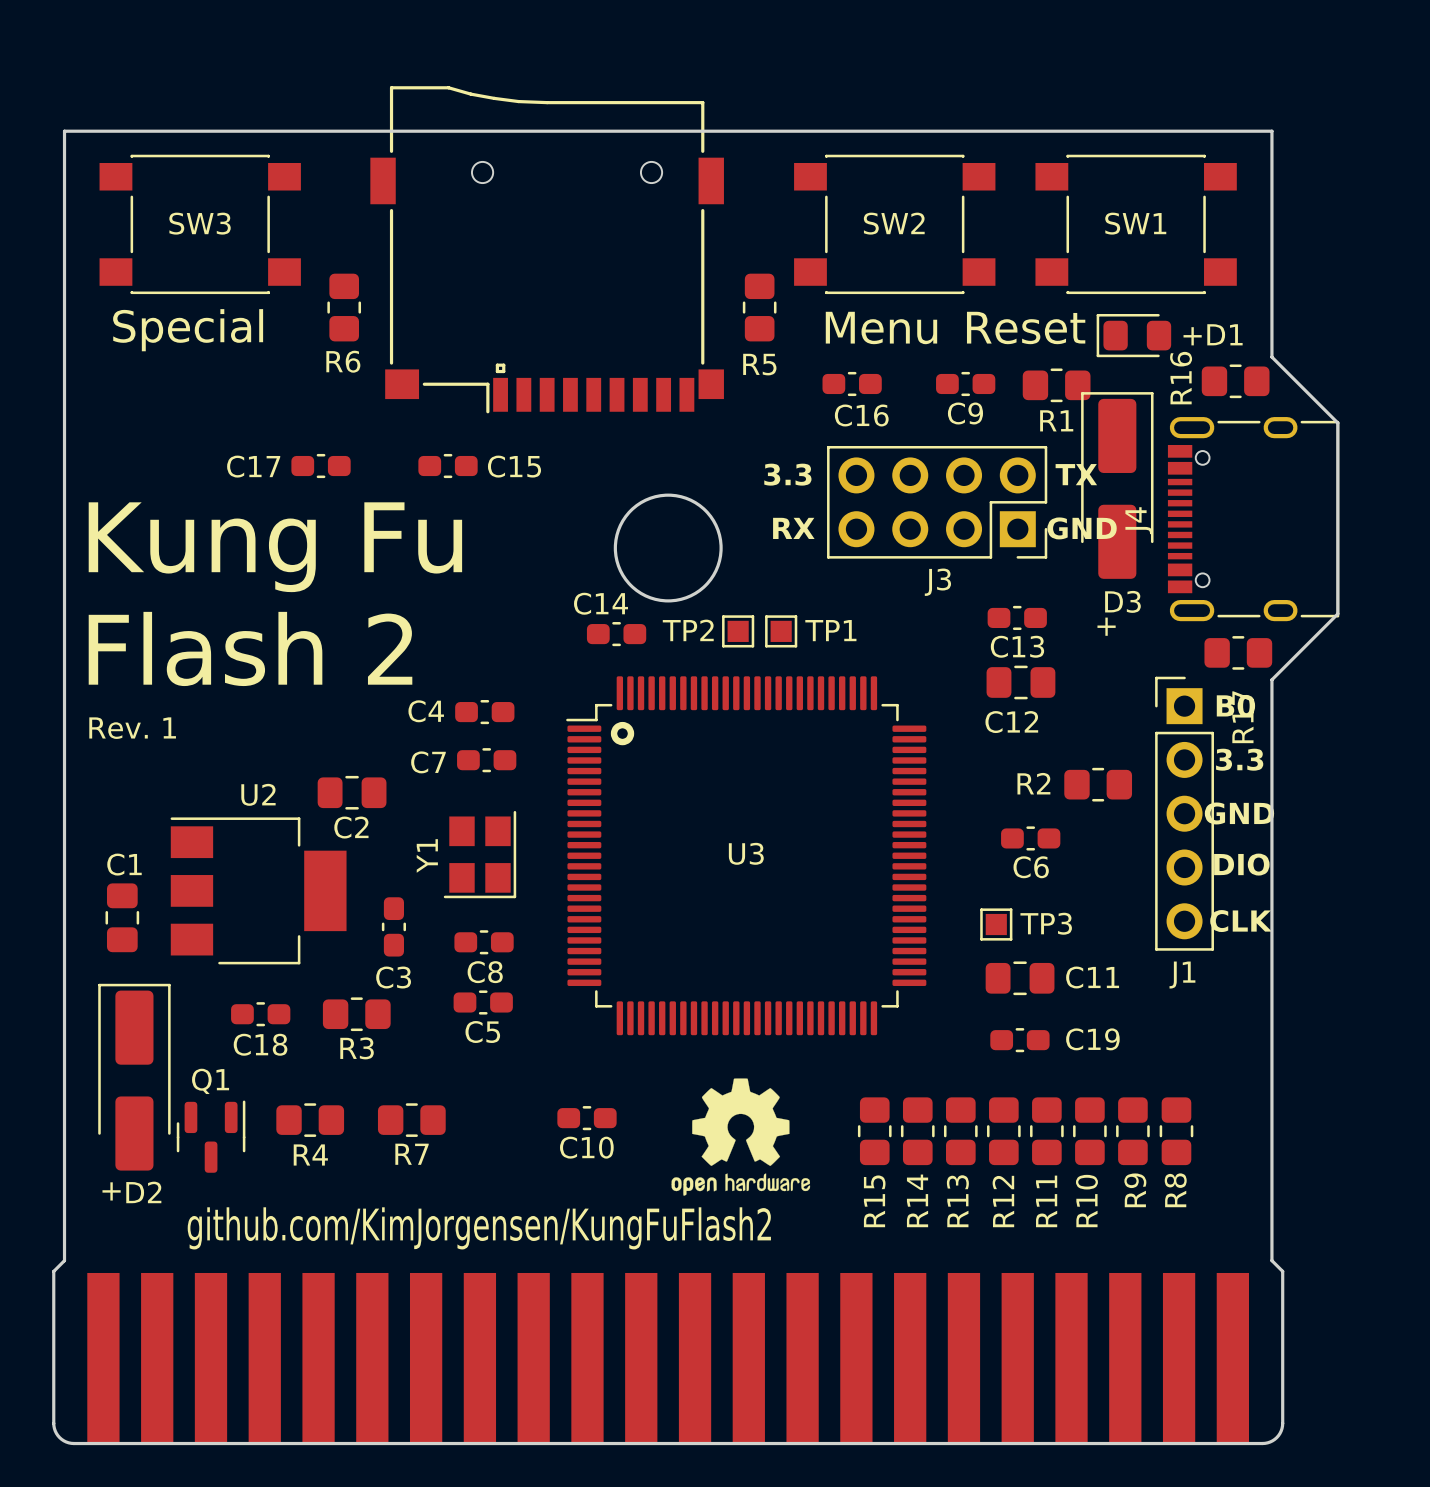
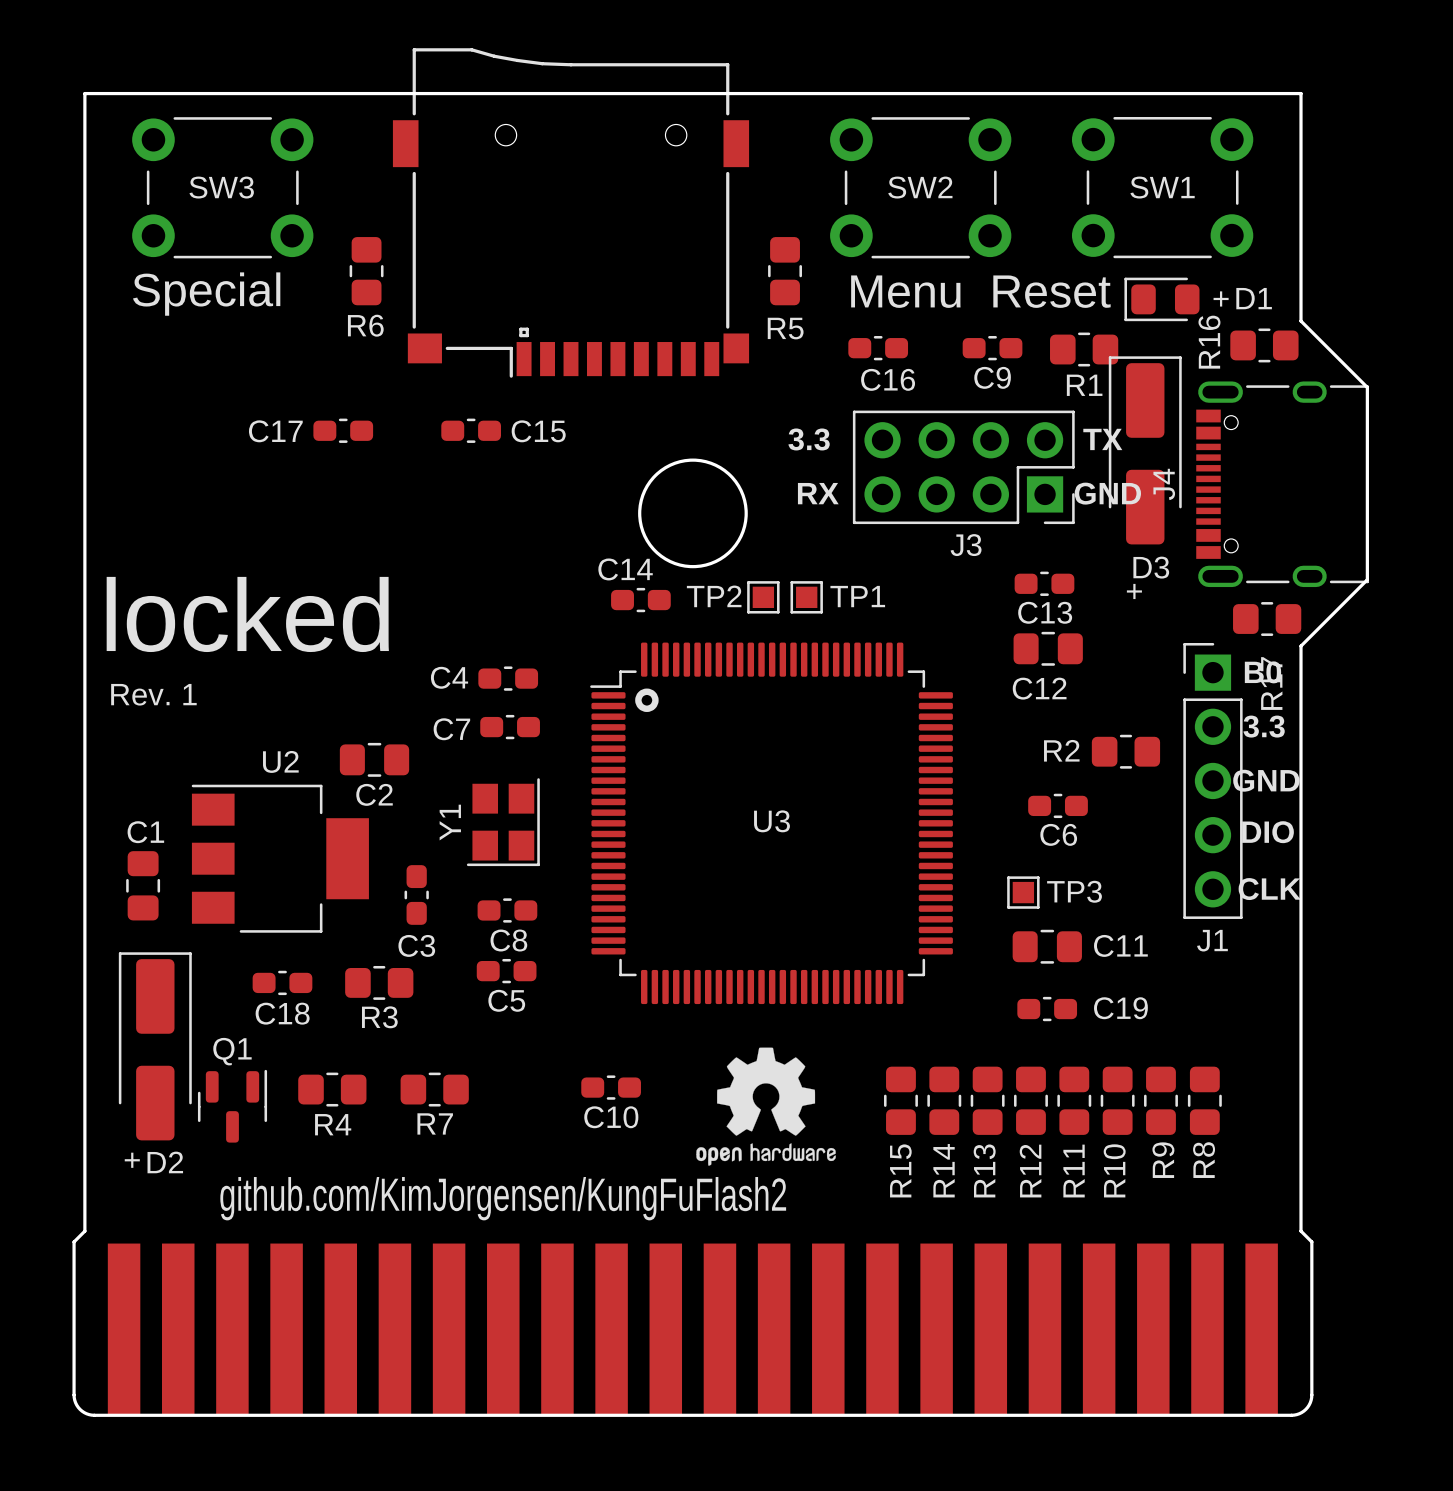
SW3 footprint: [99, 154, 301, 295] -> [132, 117, 314, 259]
SW2 footprint: [794, 154, 996, 295] -> [830, 117, 1012, 259]
SW1 footprint: [1035, 154, 1237, 295] -> [1071, 117, 1254, 259]
text: Kung Fu (275, 547) -> none
text: Flash 2 (250, 648) -> locked (247, 614)

